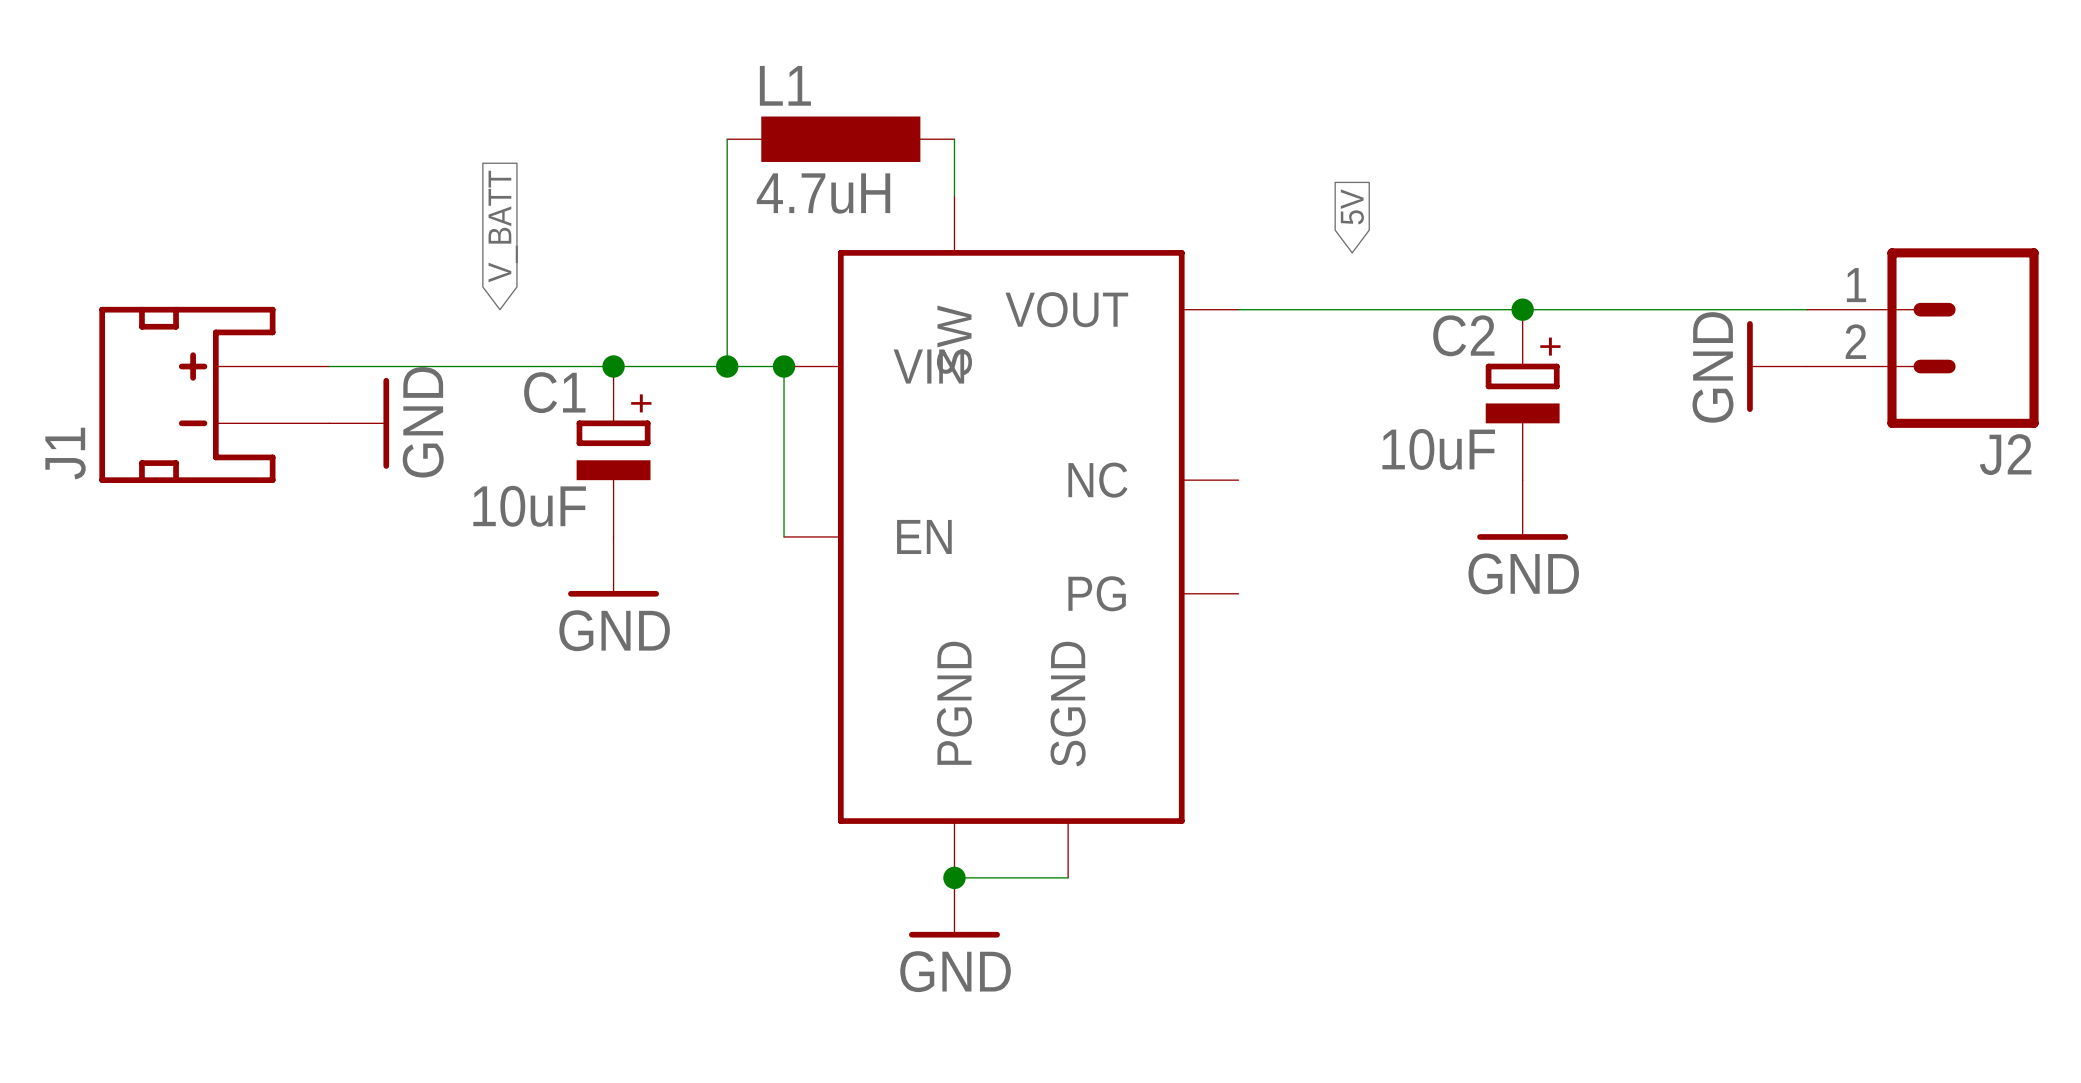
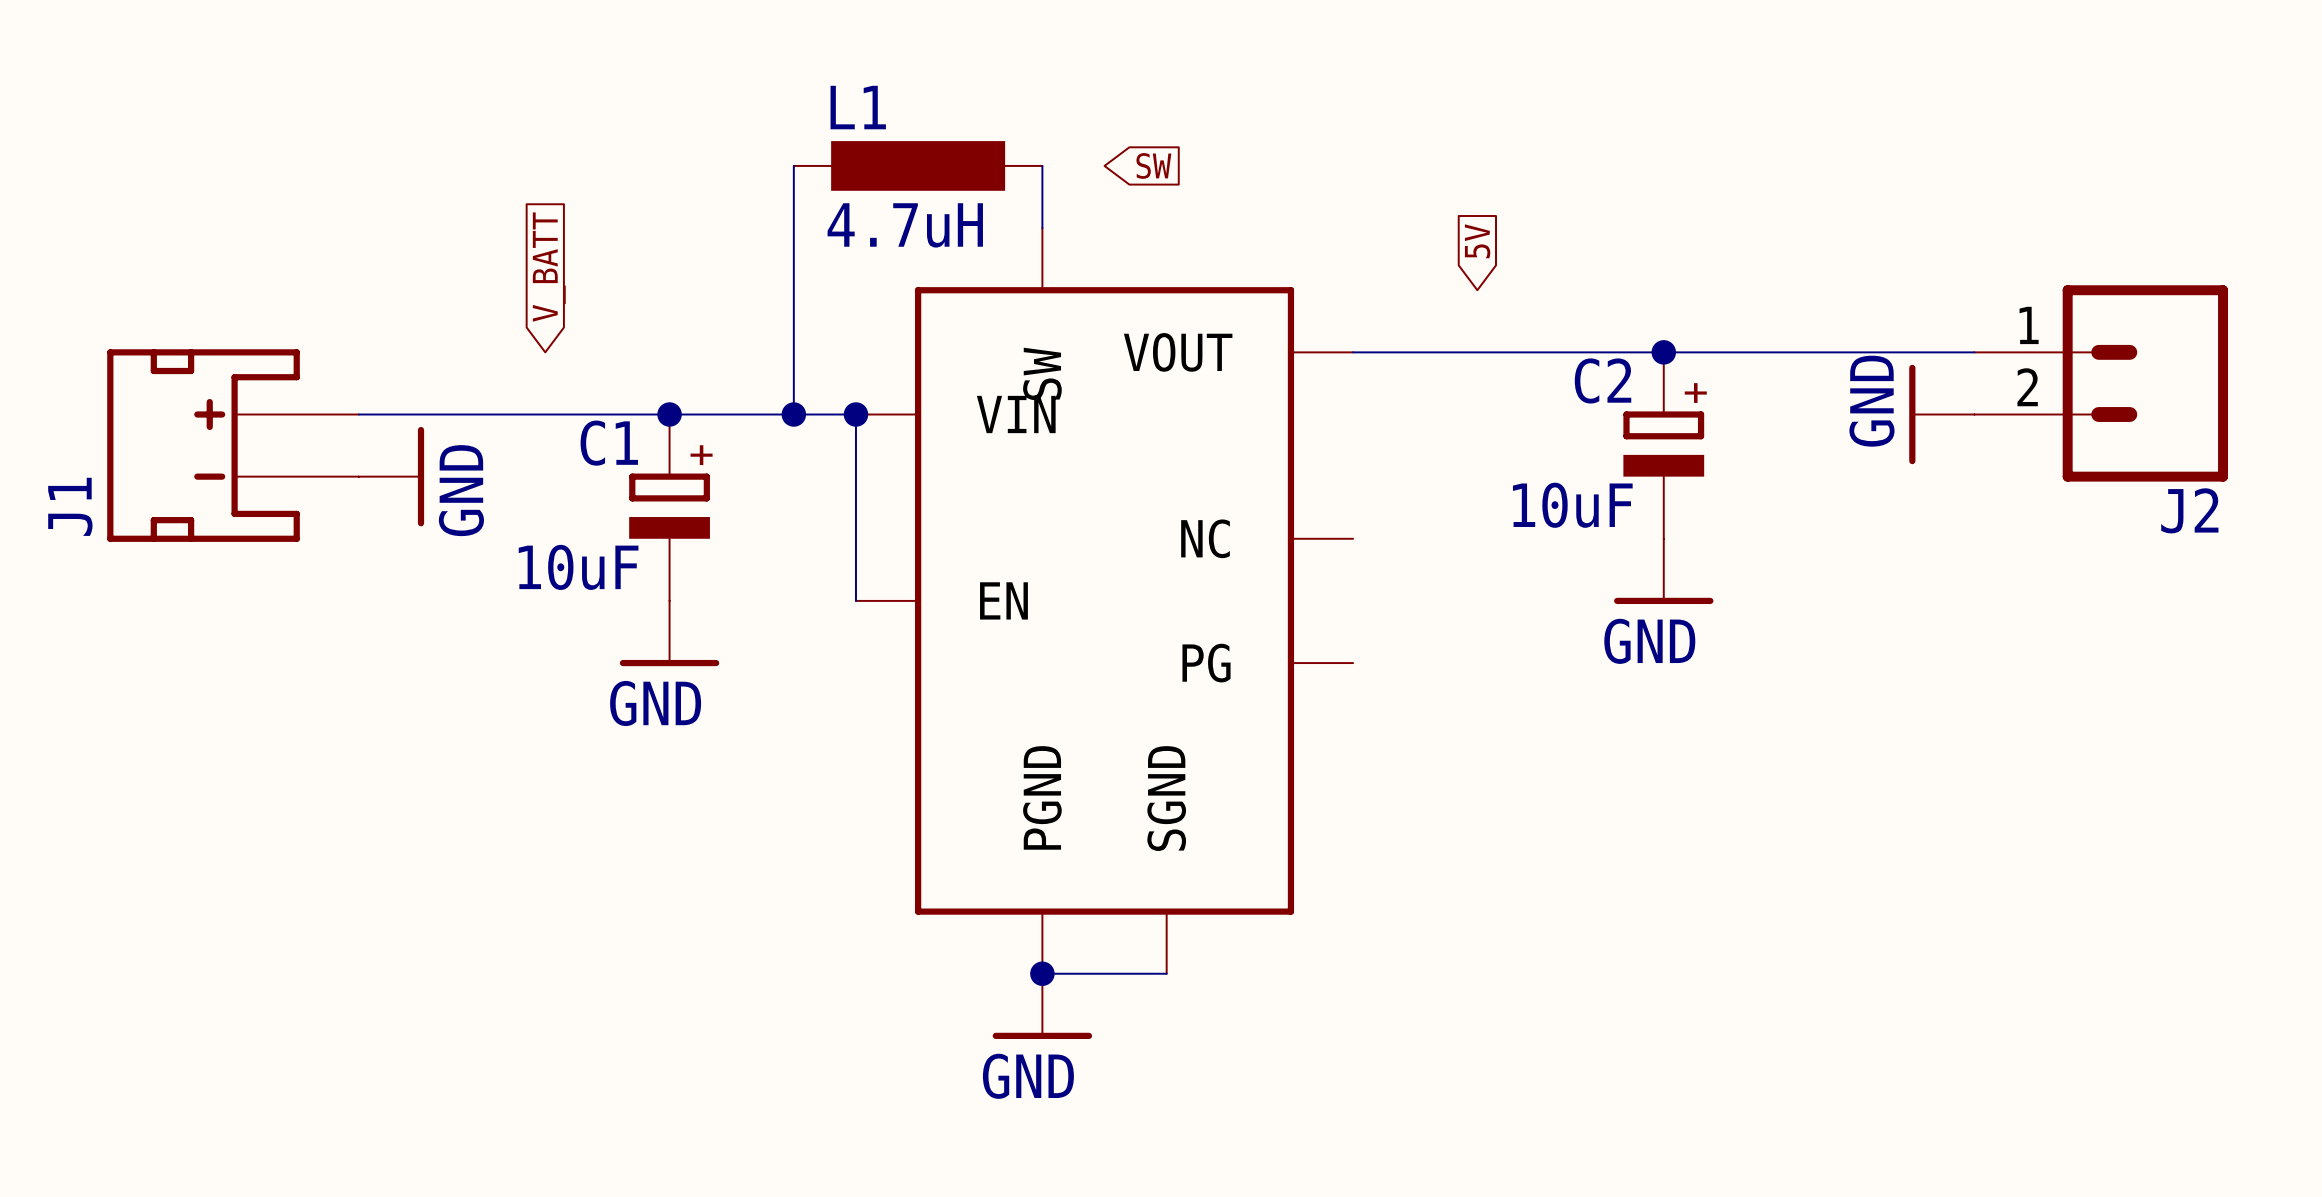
global label: none -> SW (1153, 165)

